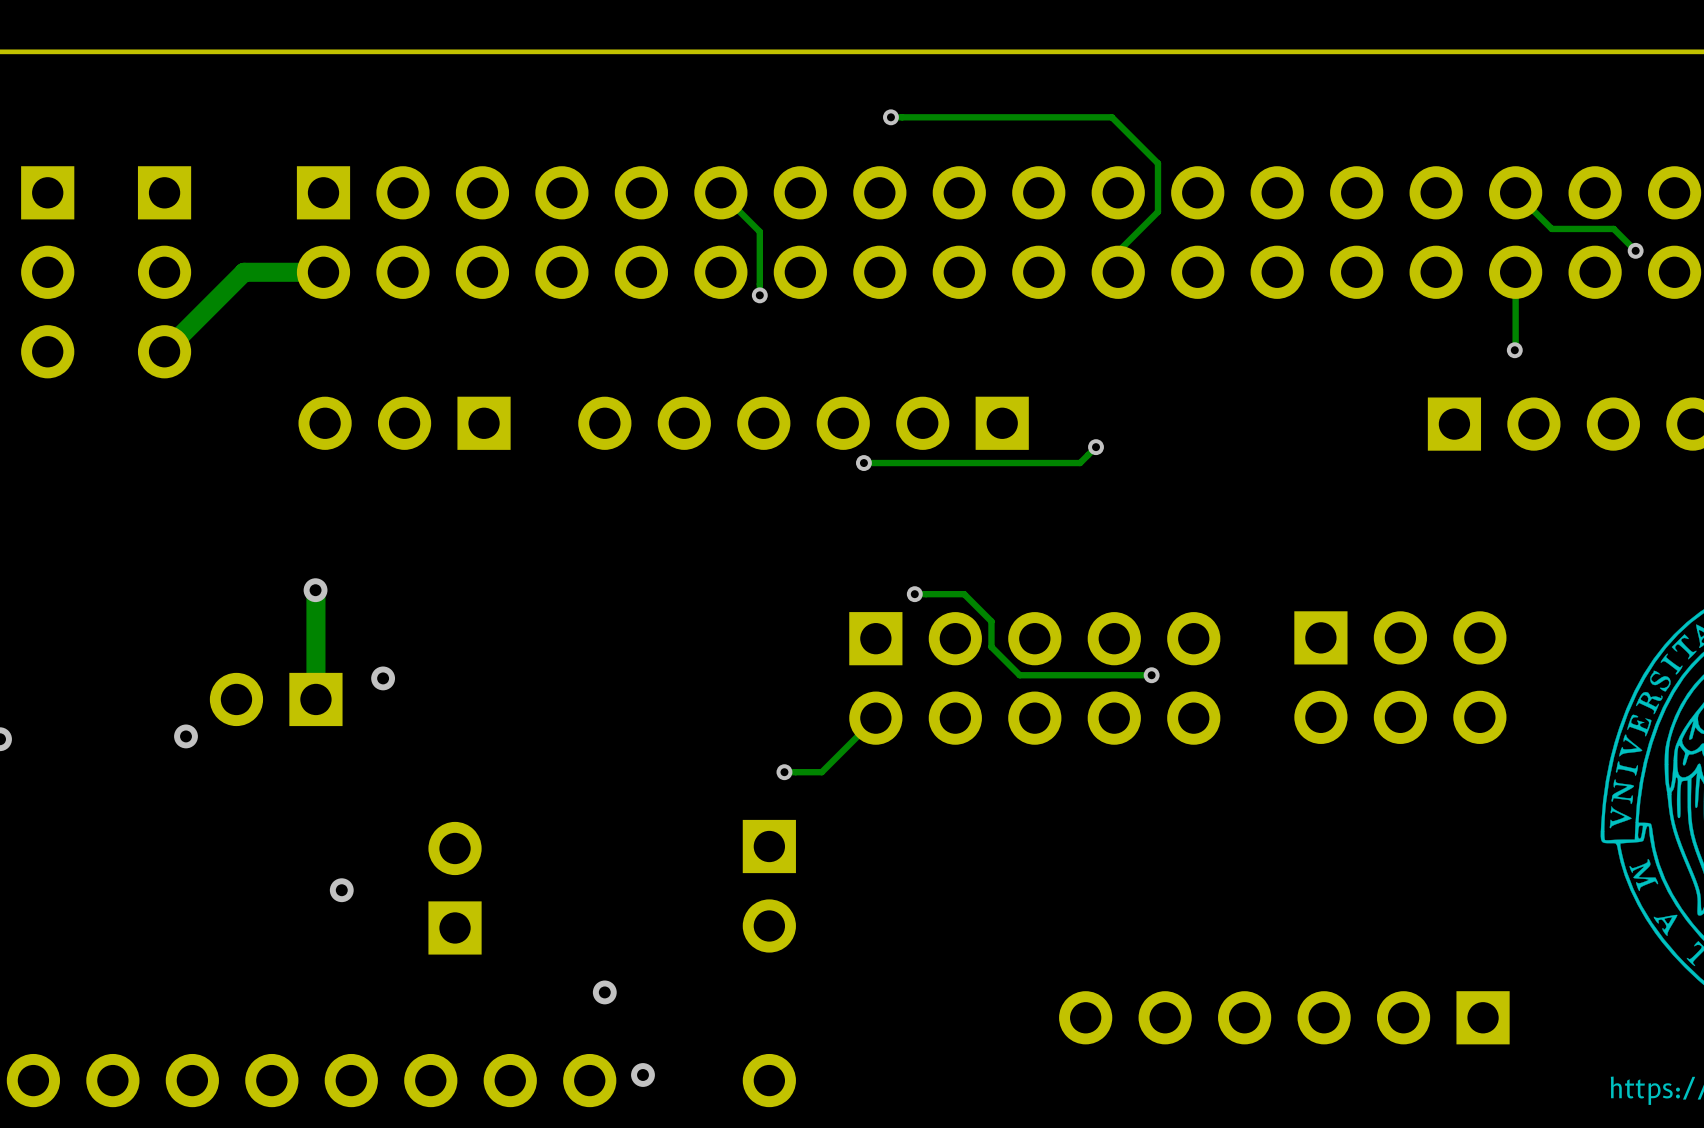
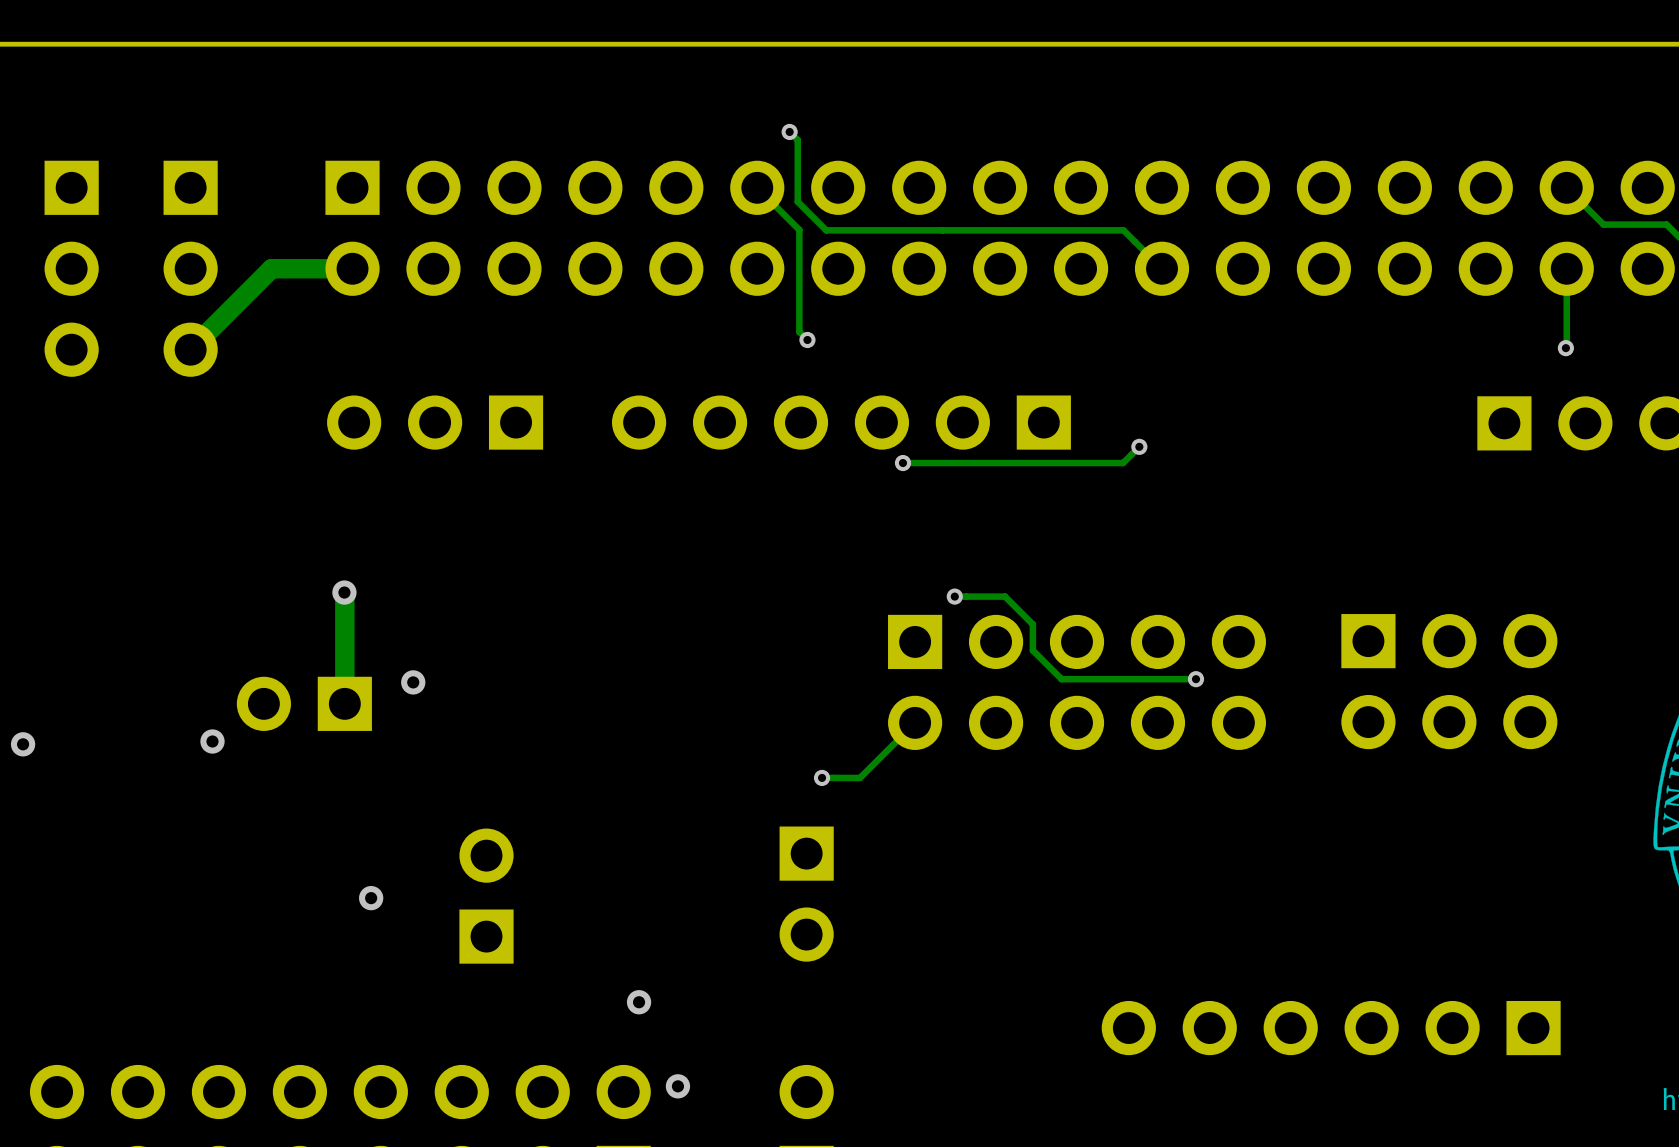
track: (890, 117) (1111, 117) (1157, 163) (1157, 211) (1118, 251) (1118, 272) -> (789, 131) (797, 140) (797, 201) (826, 230) (1123, 230) (1162, 268)
via: (890, 117) -> none
via: none -> (789, 131)
track: (759, 231) (759, 295) -> (796, 227) (799, 229) (799, 331) (807, 340)
via position: (759, 295) -> (807, 340)

